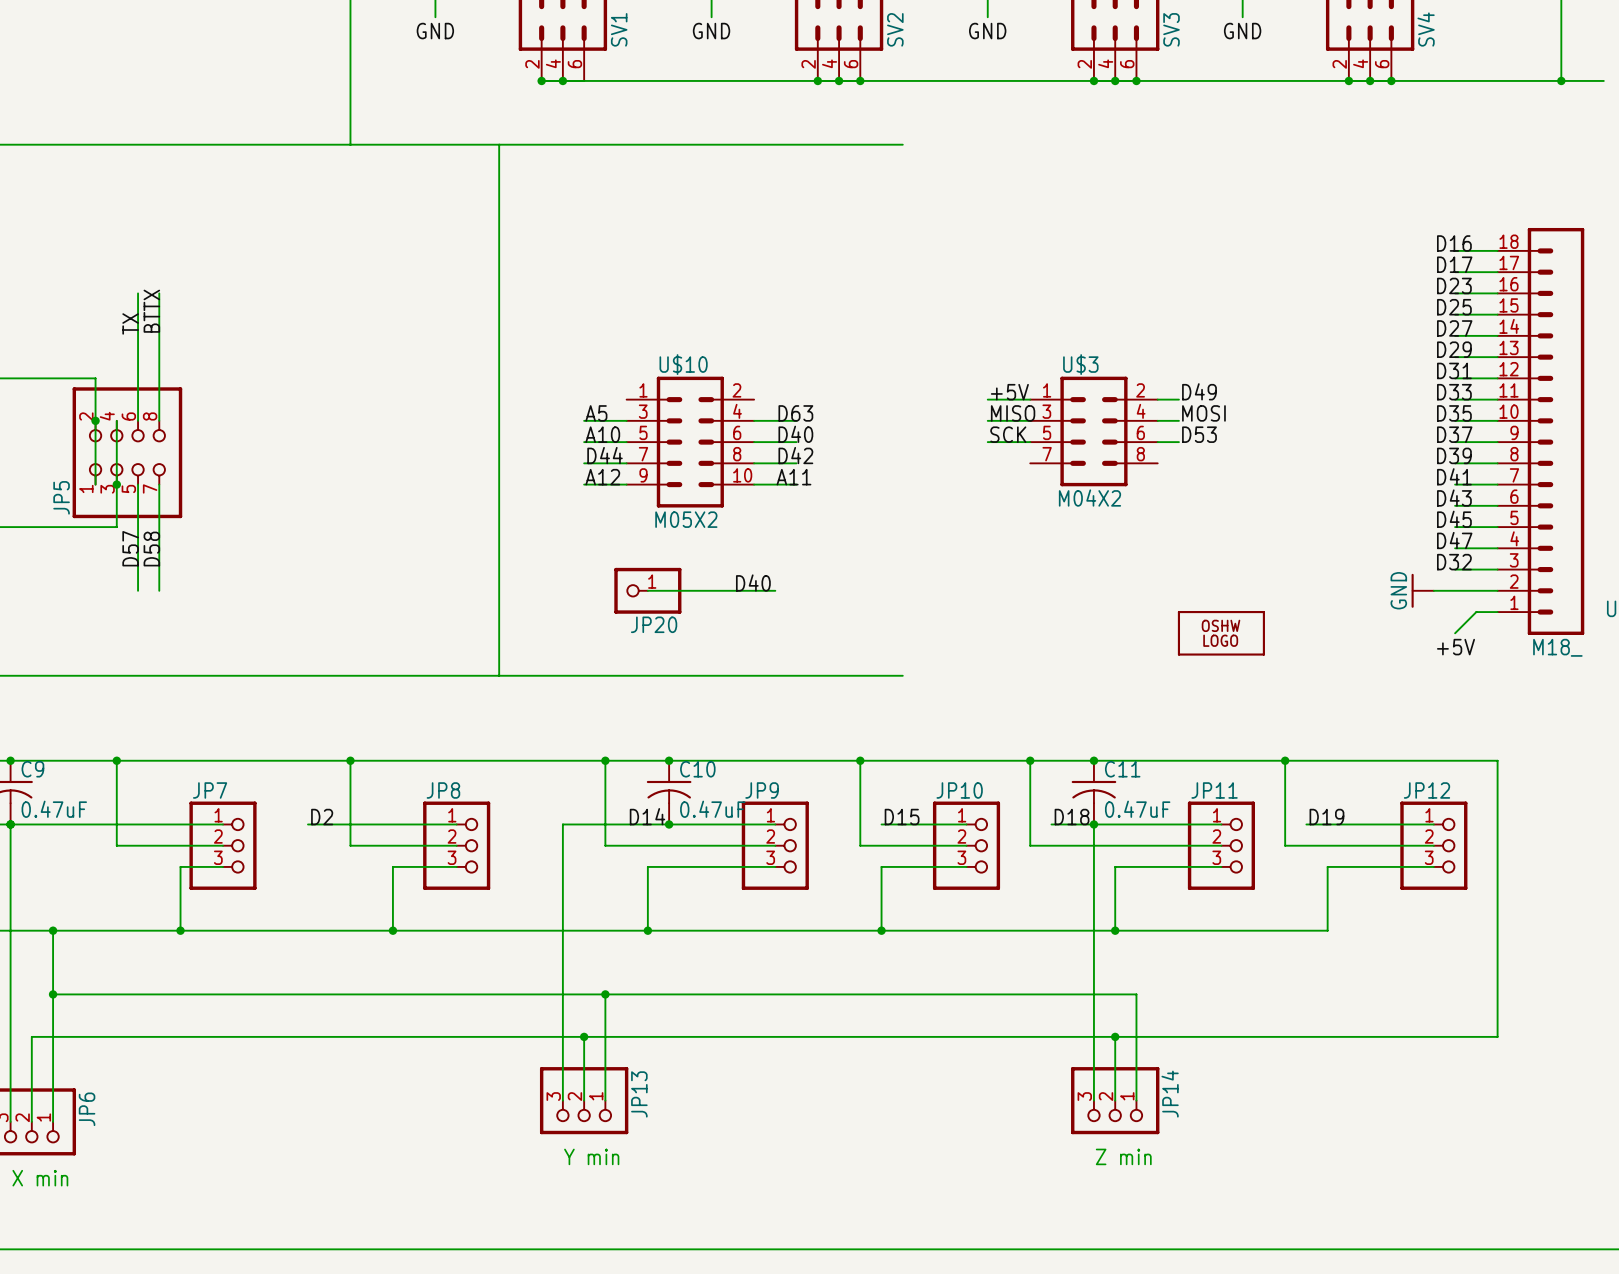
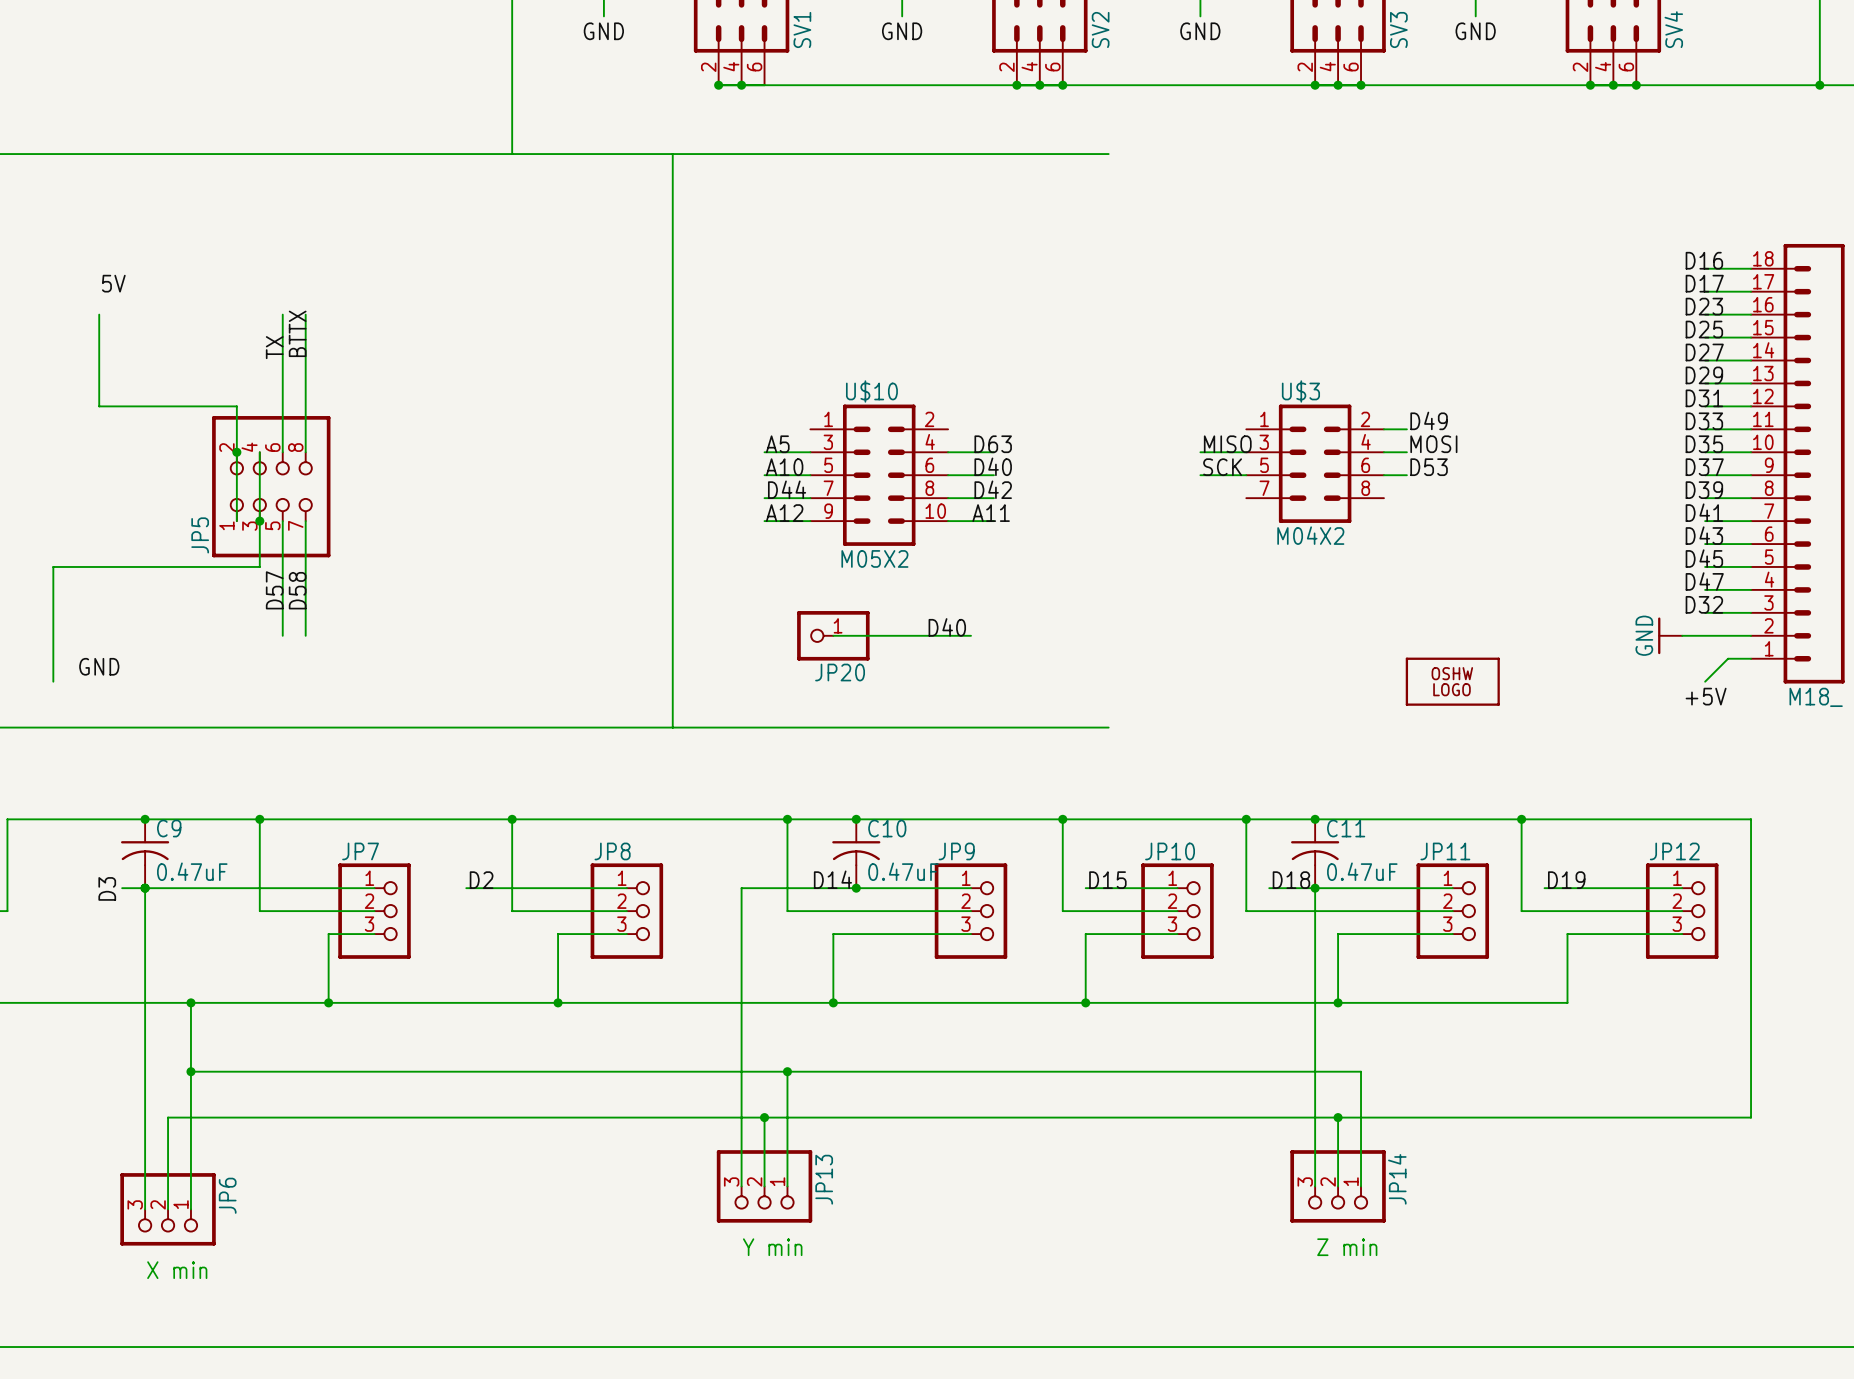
label: +5V (1009, 392) -> none
wire: (987, 399) (1030, 399) -> none

